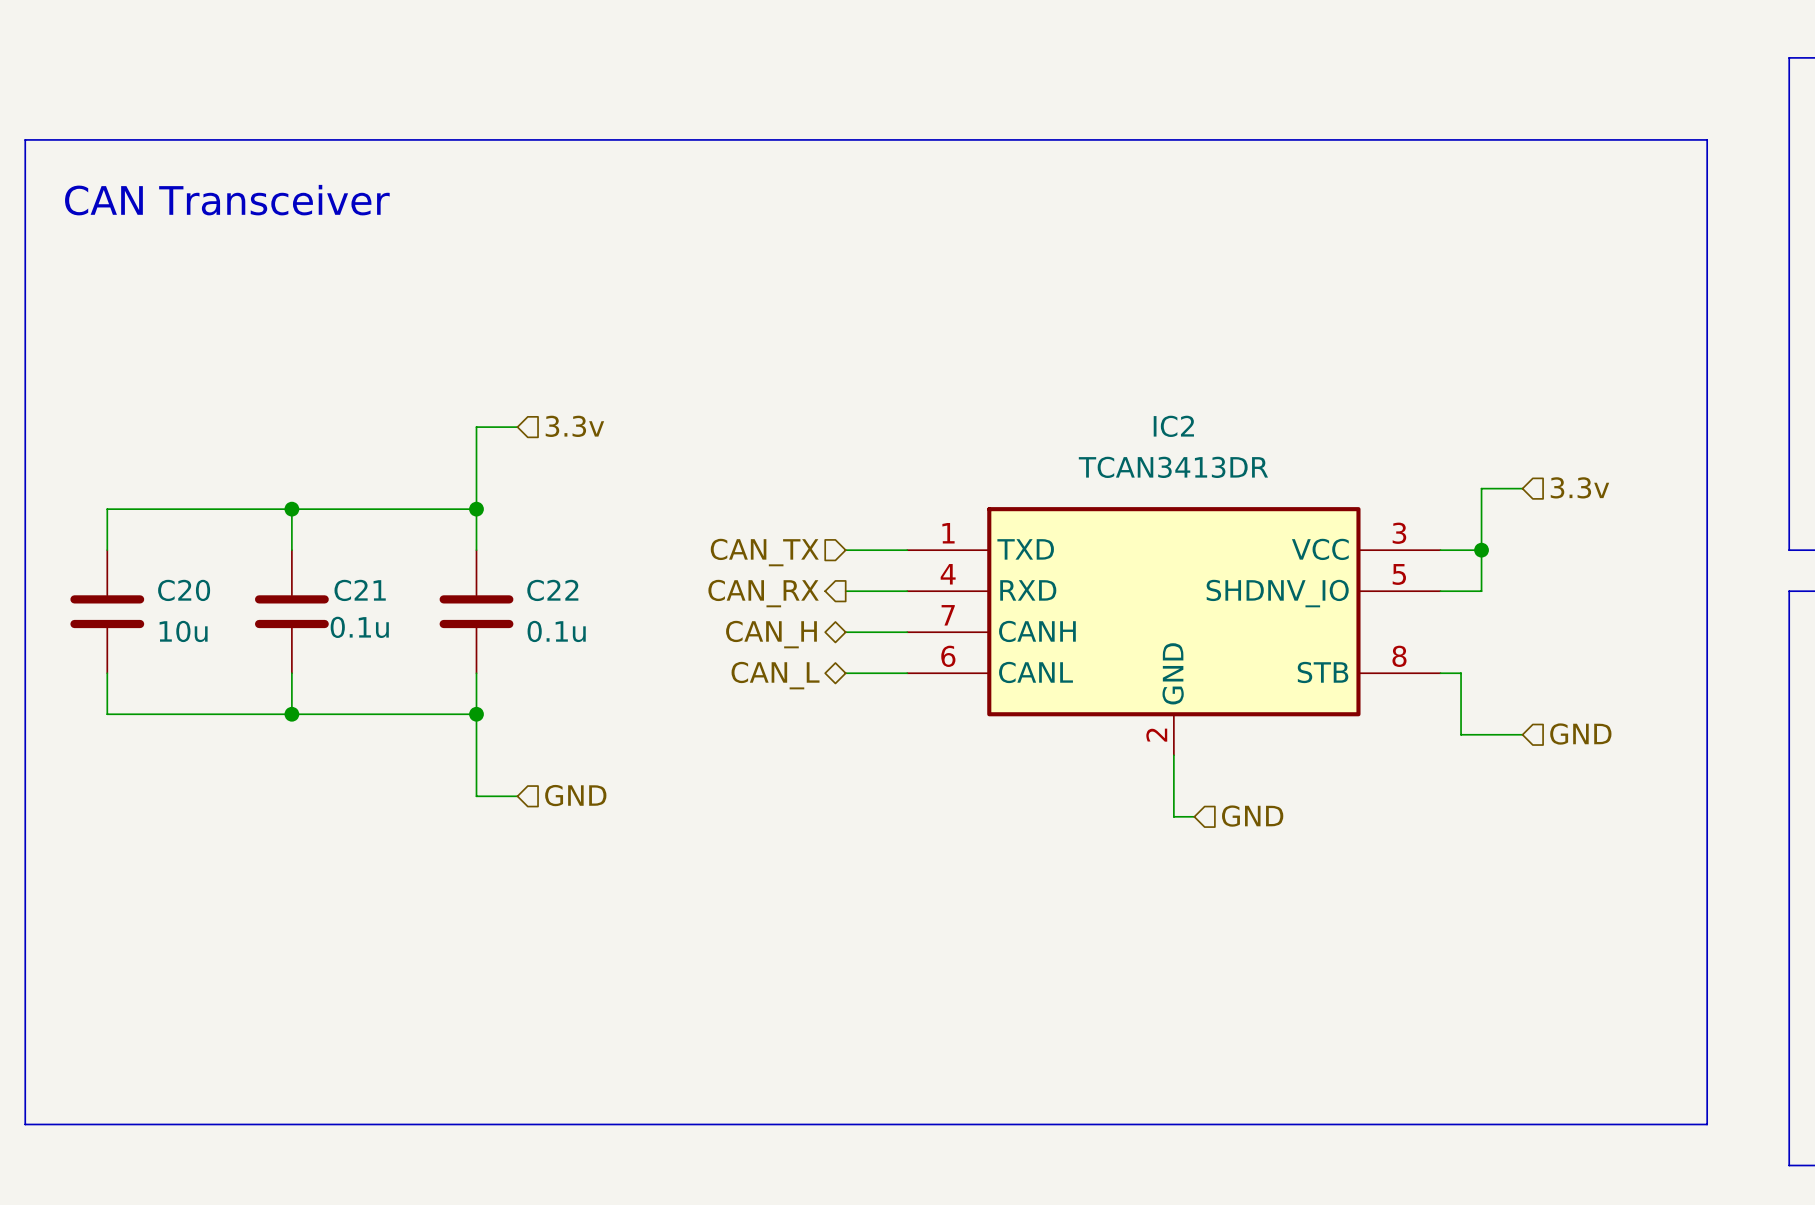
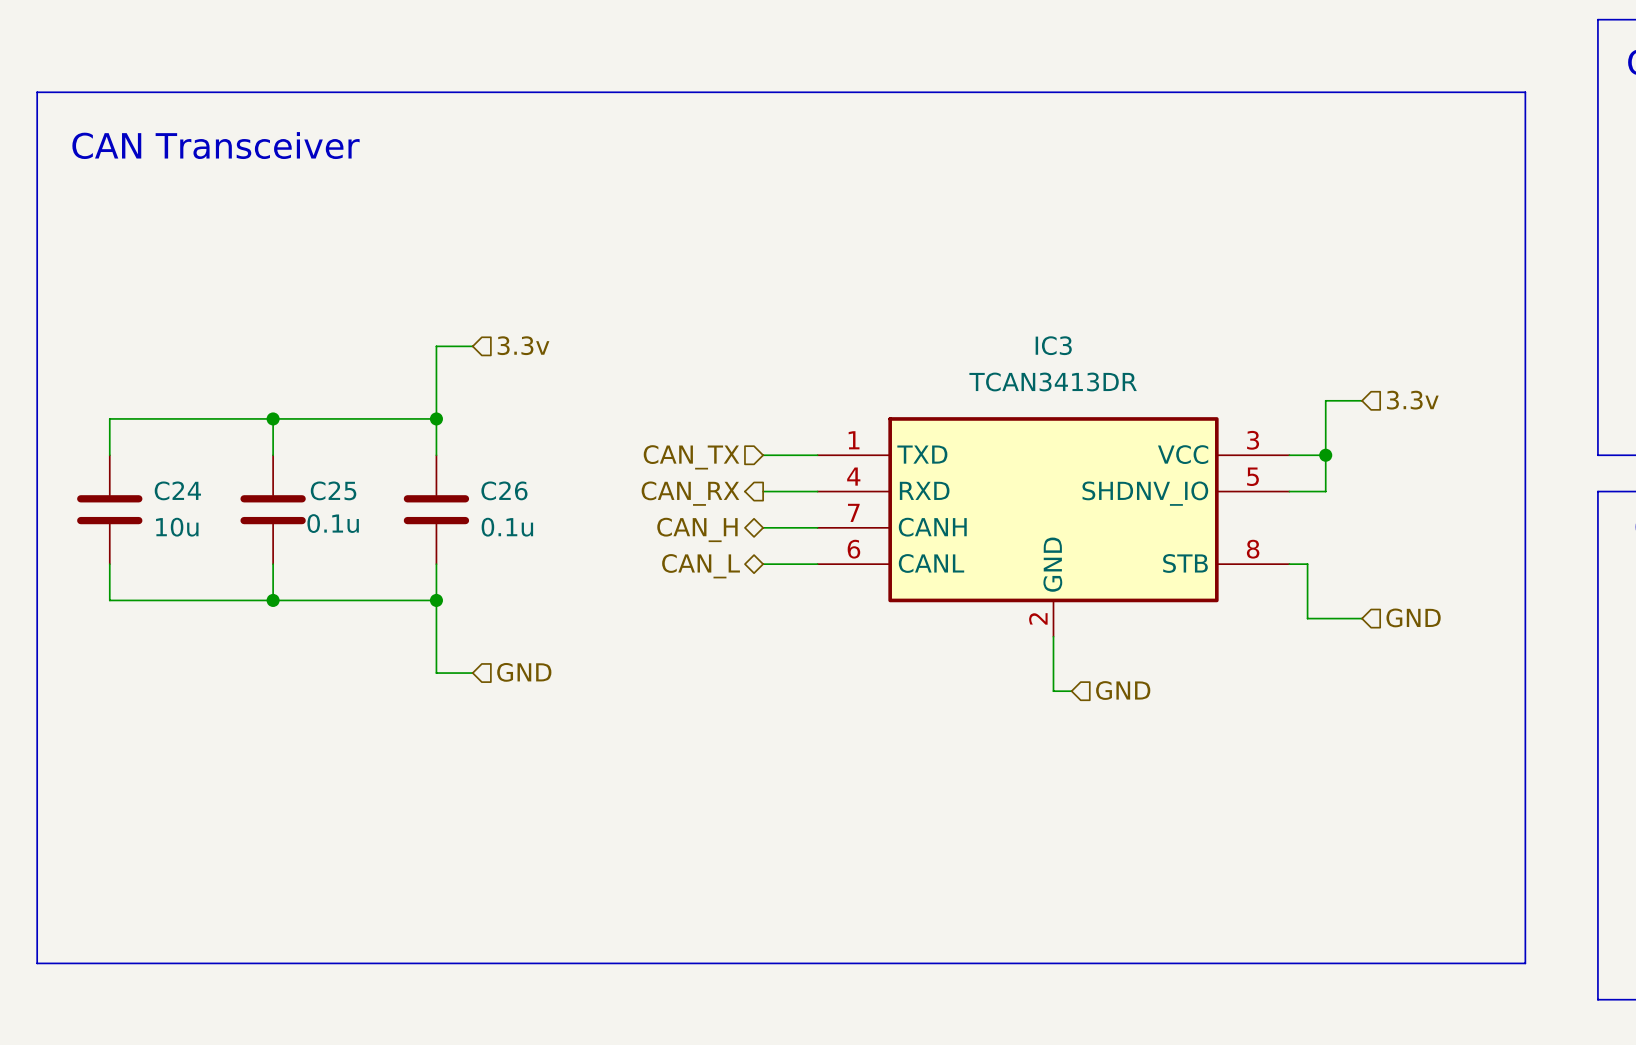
IC2 name: IC2 (1173, 426) -> IC3 (1053, 345)
C20 name: C20 (184, 590) -> C24 (177, 490)
C21 name: C21 (360, 590) -> C25 (333, 490)
C22 name: C22 (552, 590) -> C26 (504, 490)

